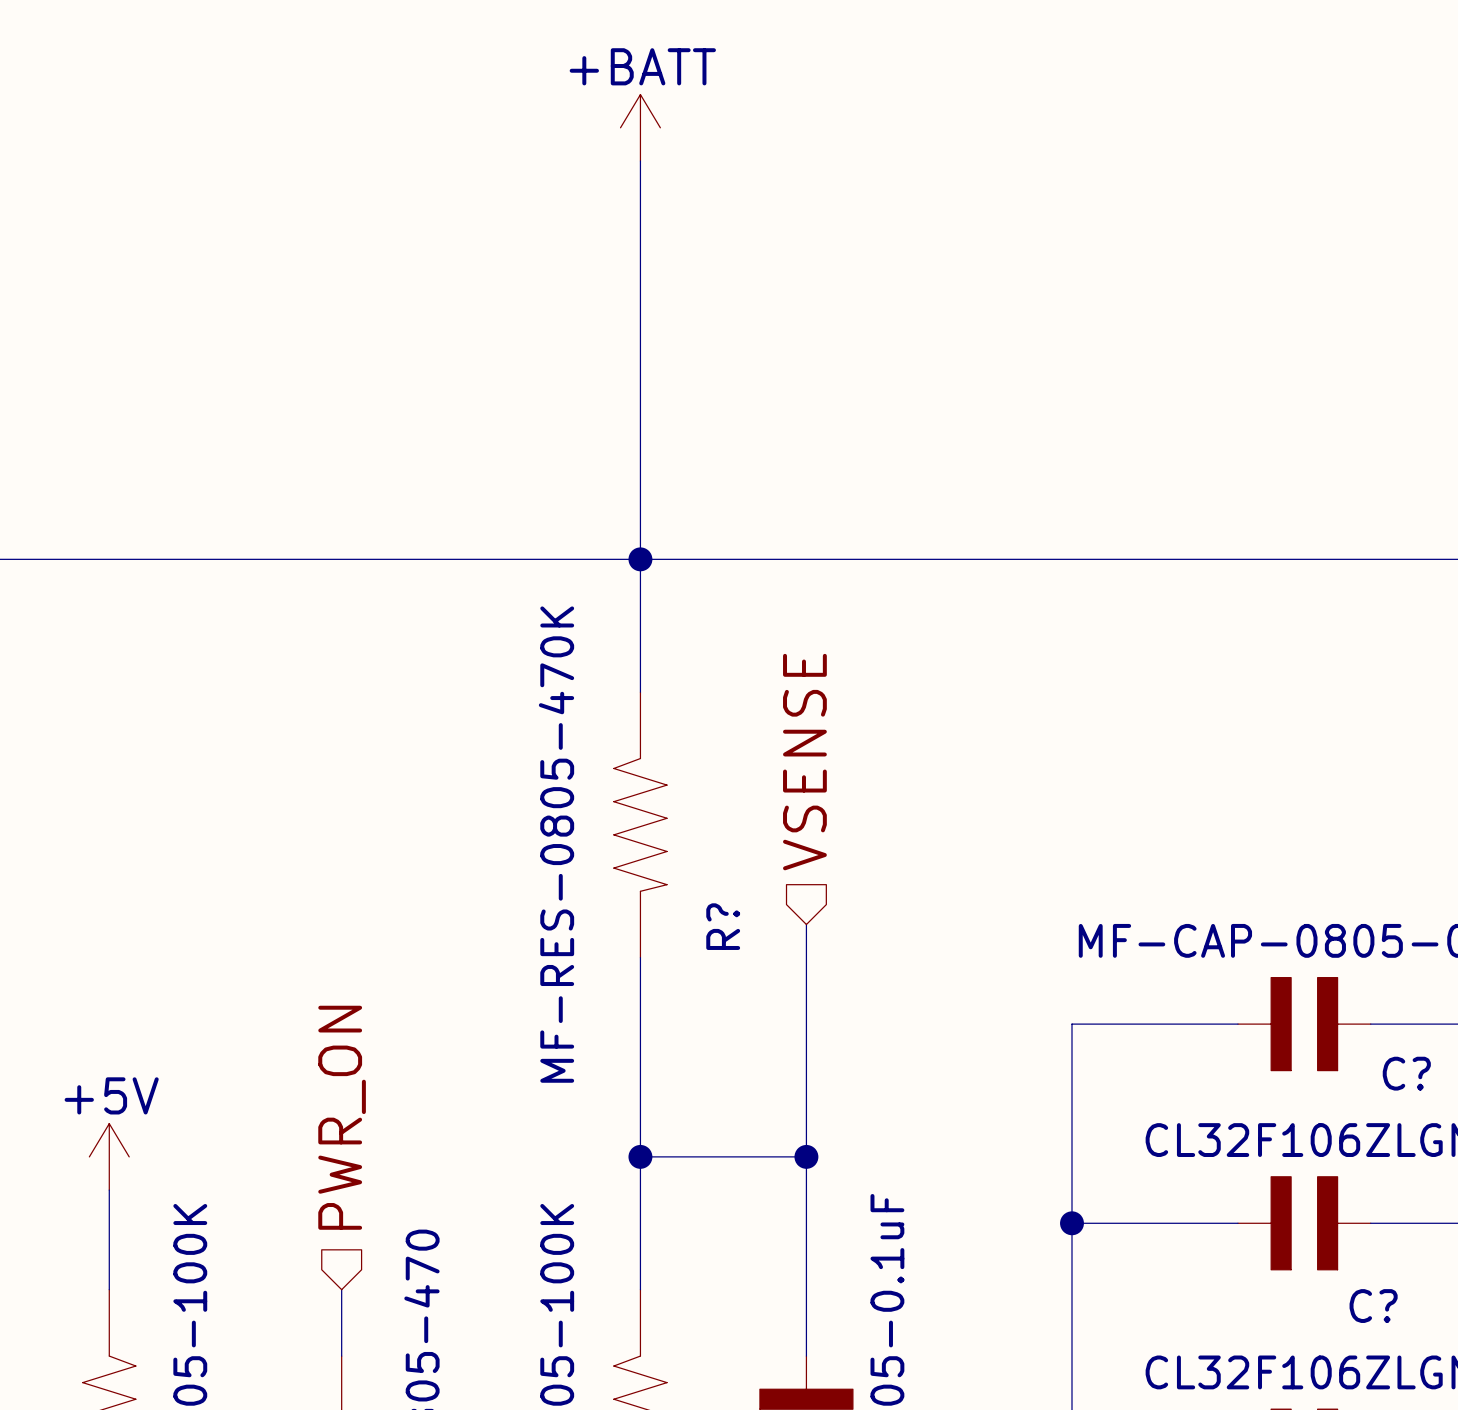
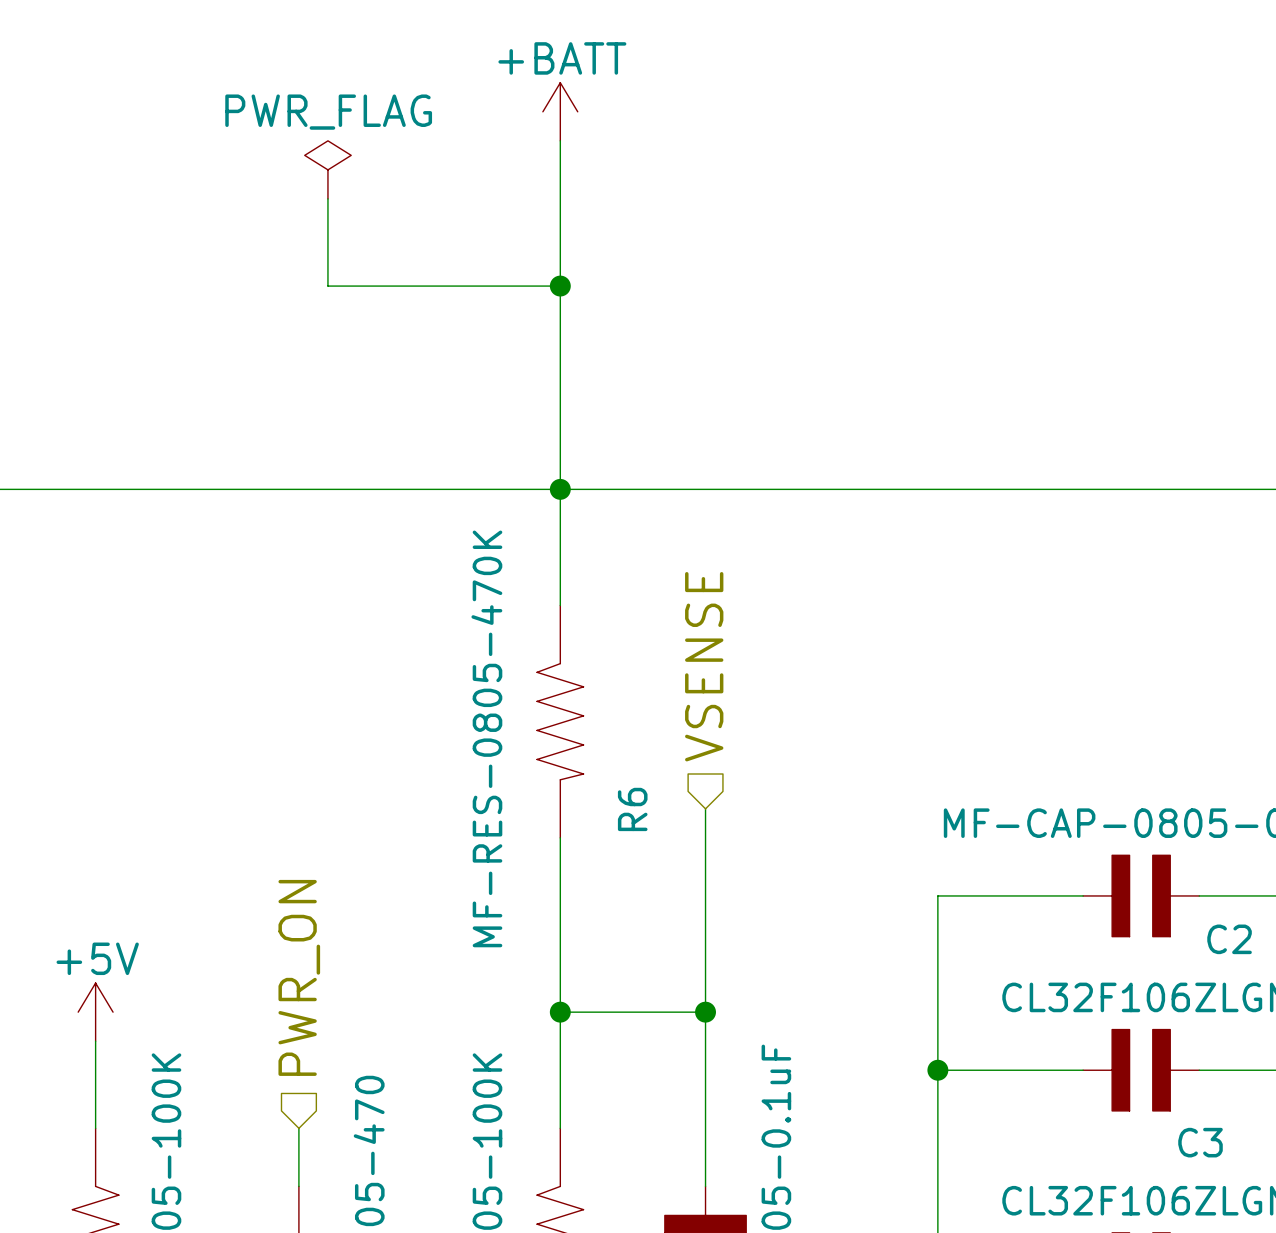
power symbol: none -> PWR_FLAG (327, 169)
wire: none -> (327, 198) (327, 286) (560, 286)
junction: none -> (560, 286)
R? name: R? (723, 926) -> R6 (632, 809)
C? name: C? (1406, 1073) -> C2 (1229, 939)
C? name: C? (1373, 1306) -> C3 (1200, 1142)

